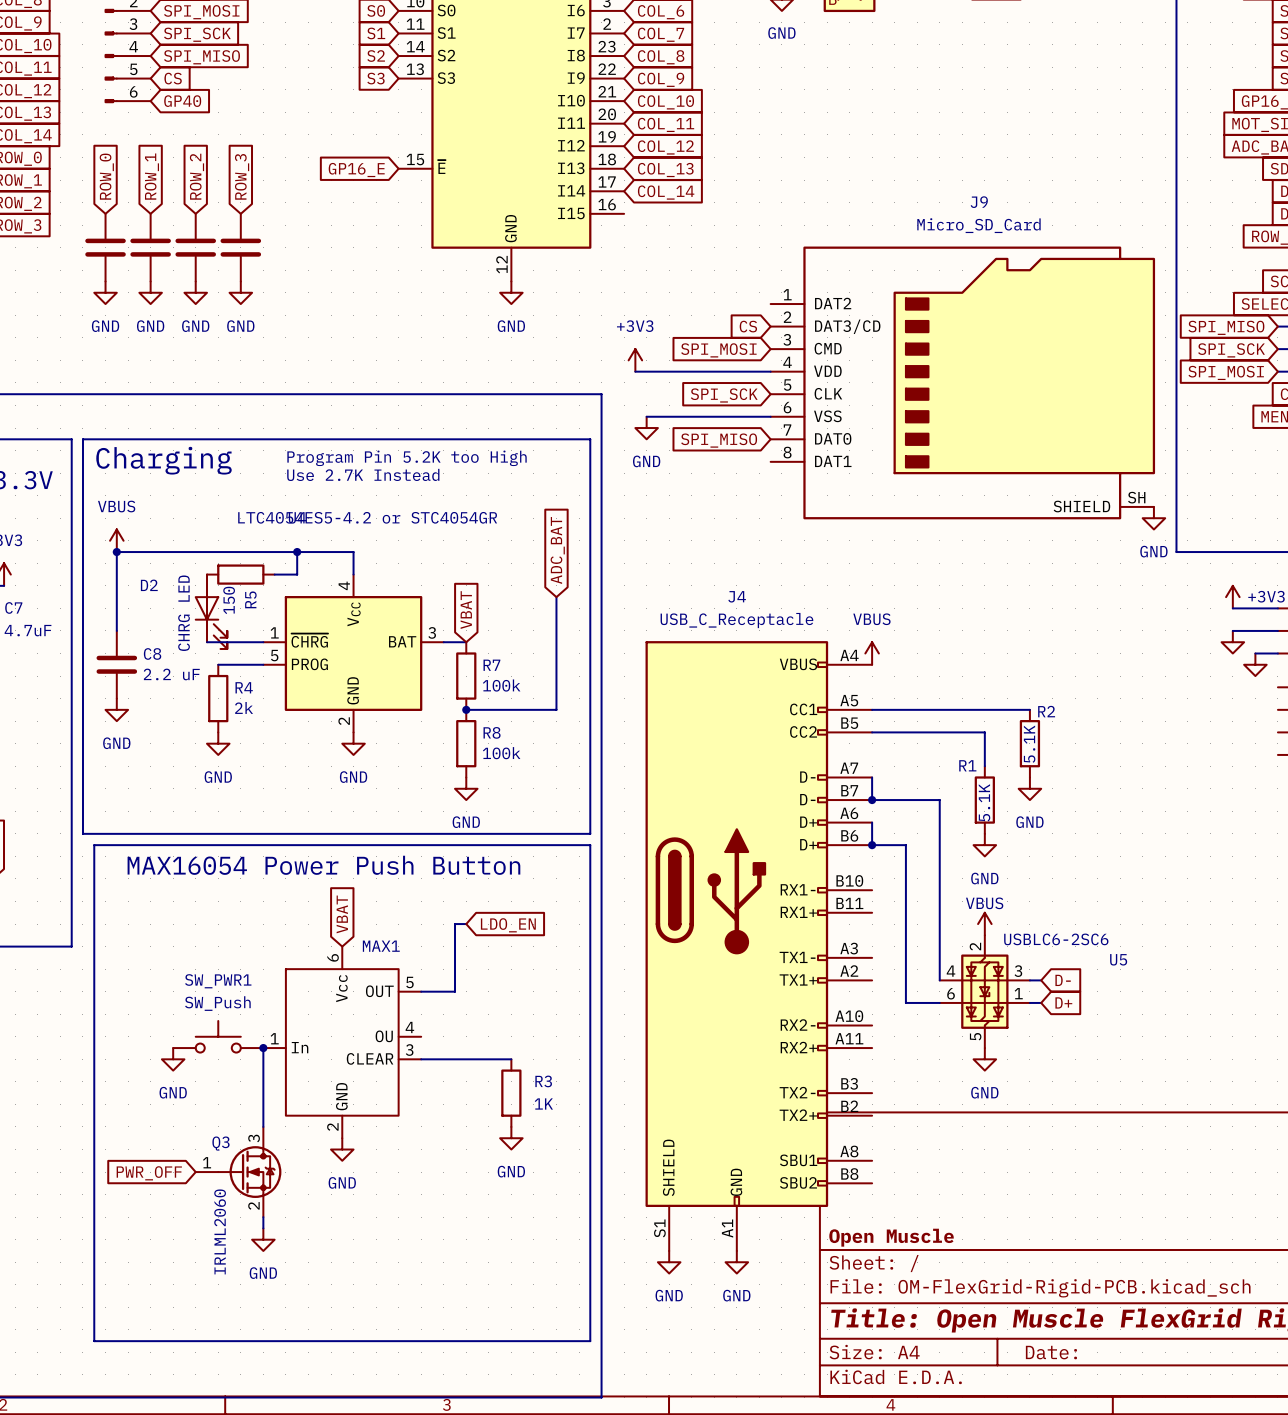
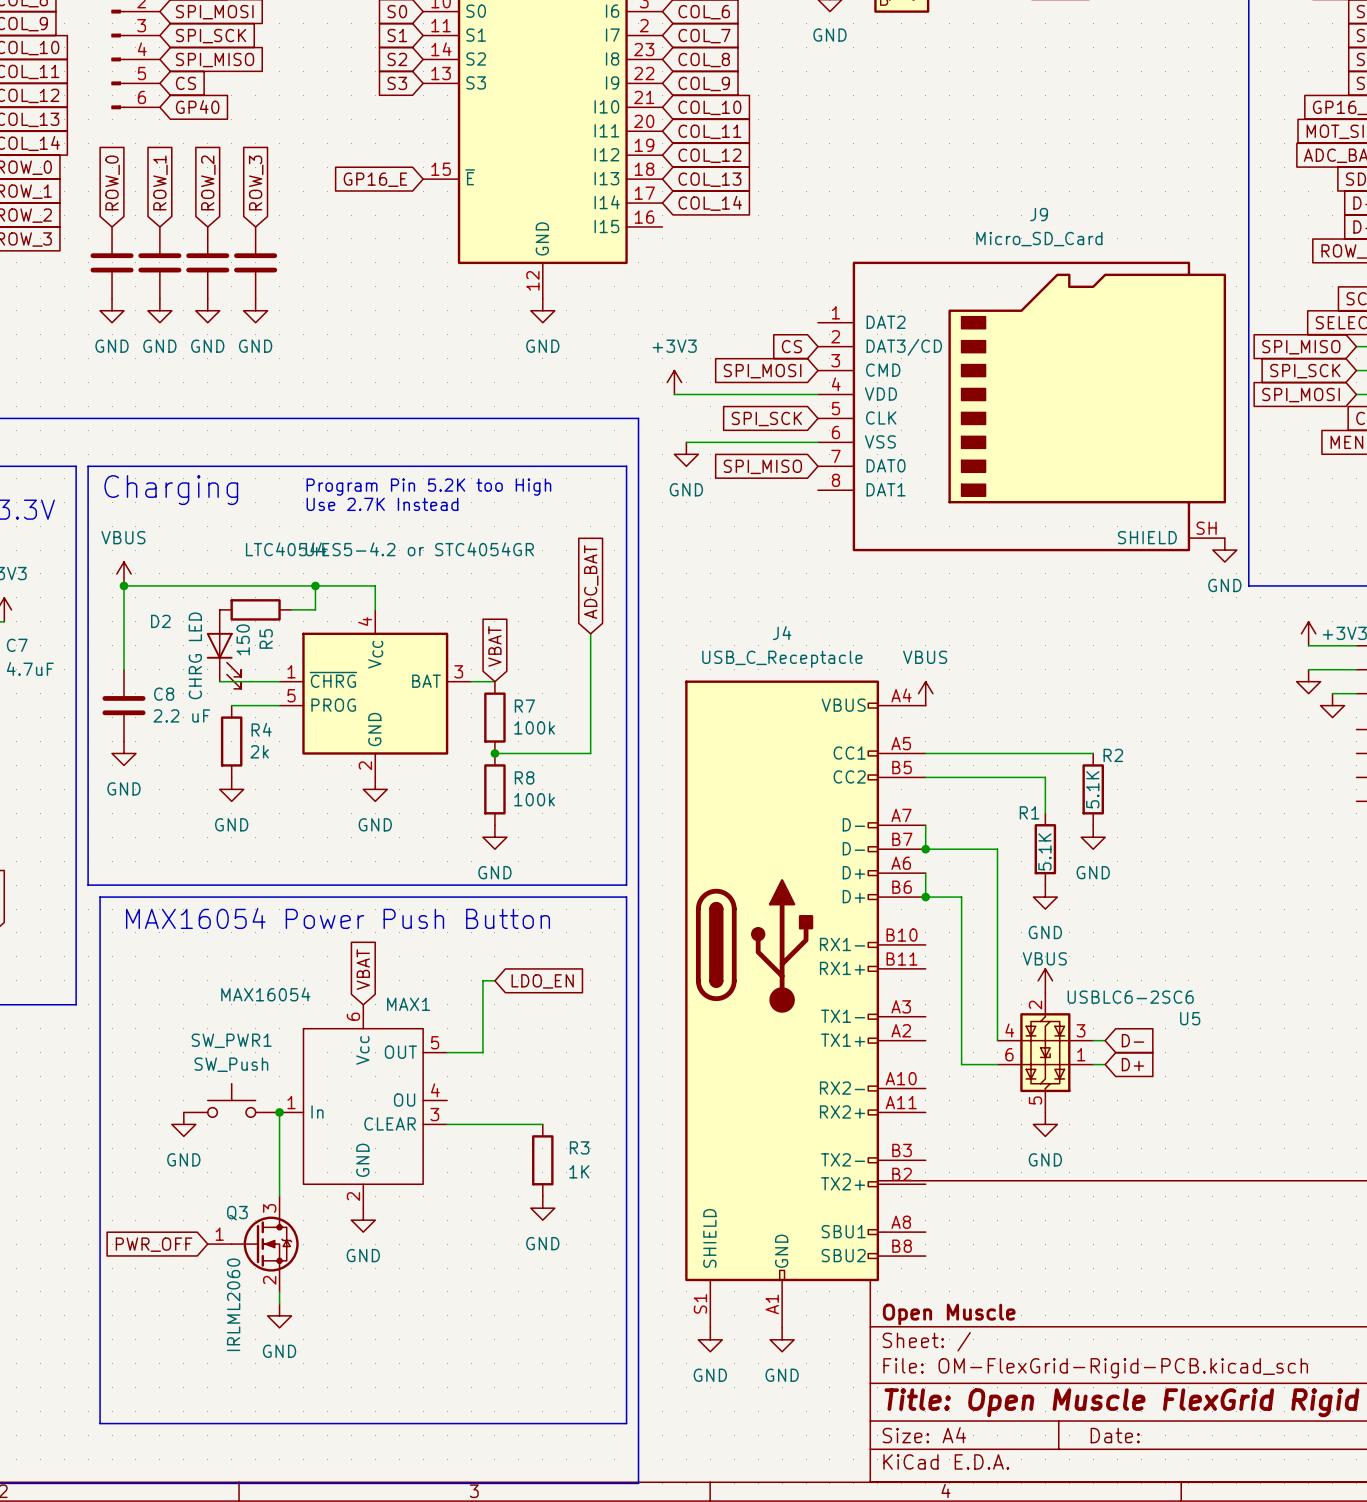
MAX1 value: none -> MAX16054 (265, 994)

